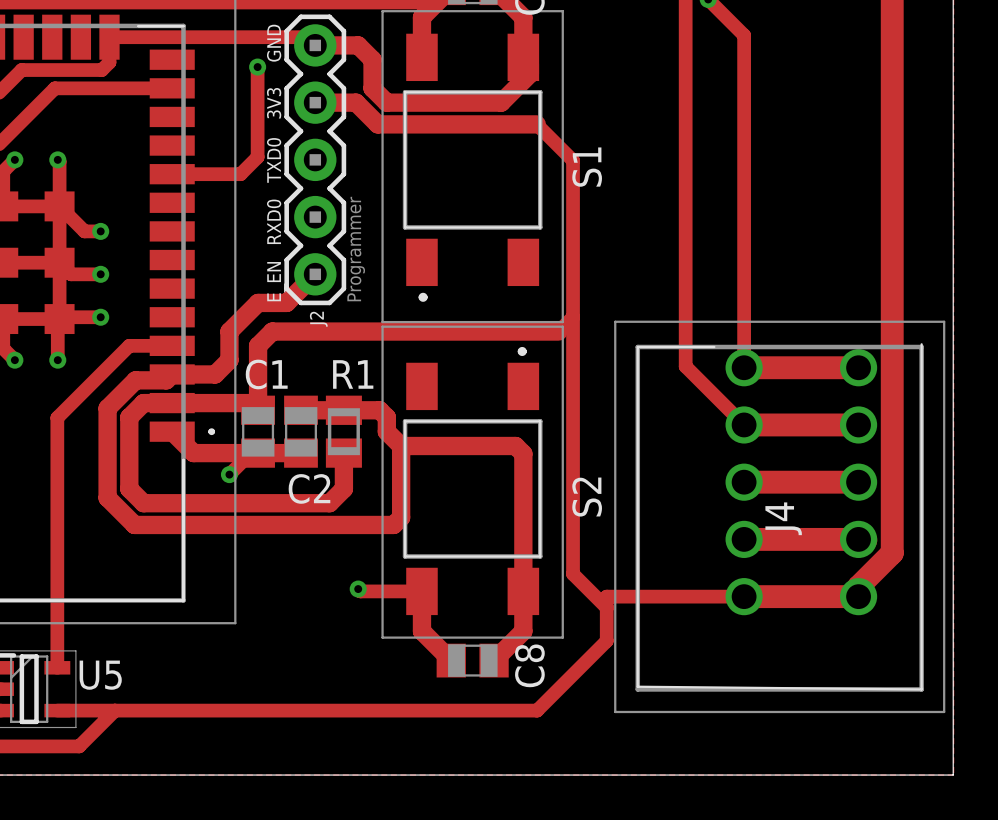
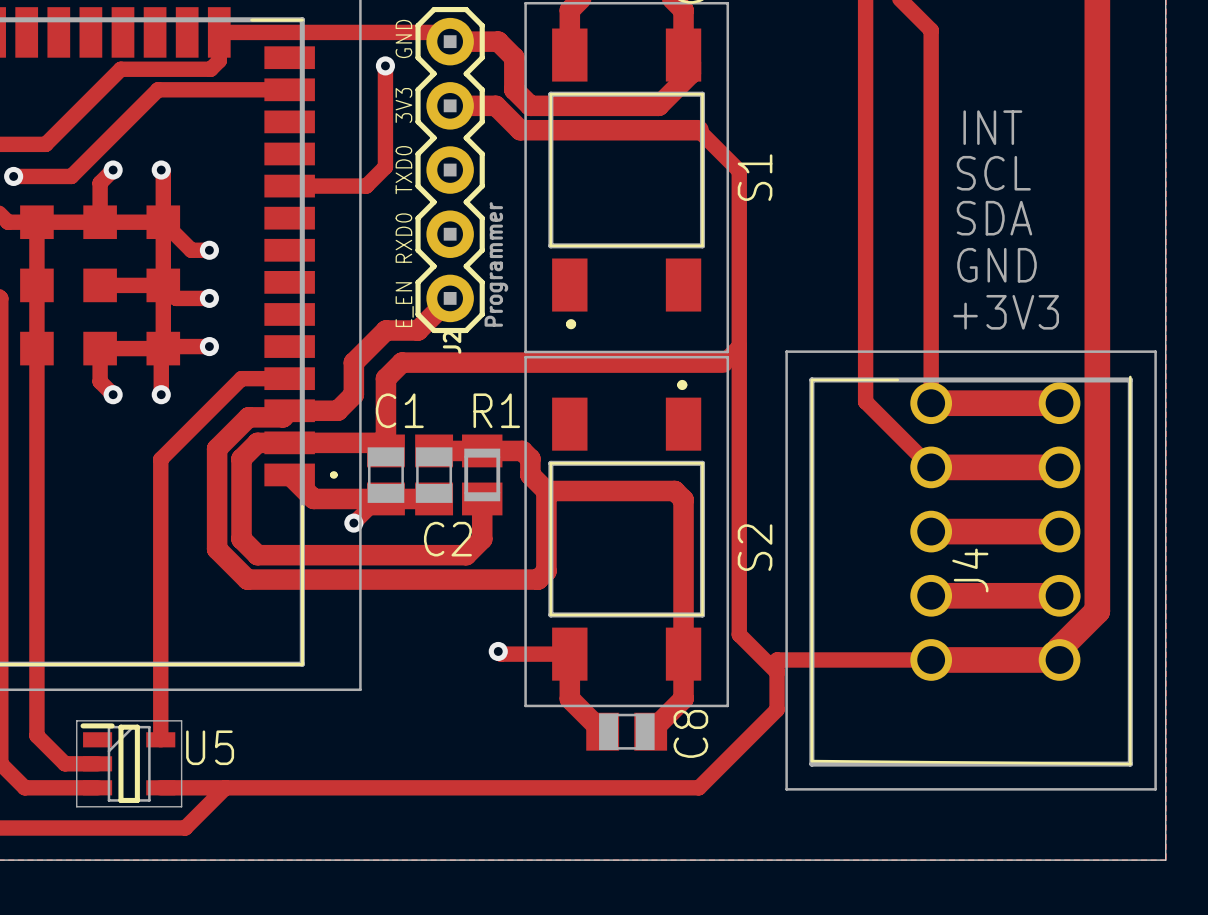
text: none -> INT (992, 127)
text: none -> SCL (993, 173)
text: none -> SDA (994, 218)
text: none -> GND (997, 265)
text: none -> +3V3 (1006, 312)

